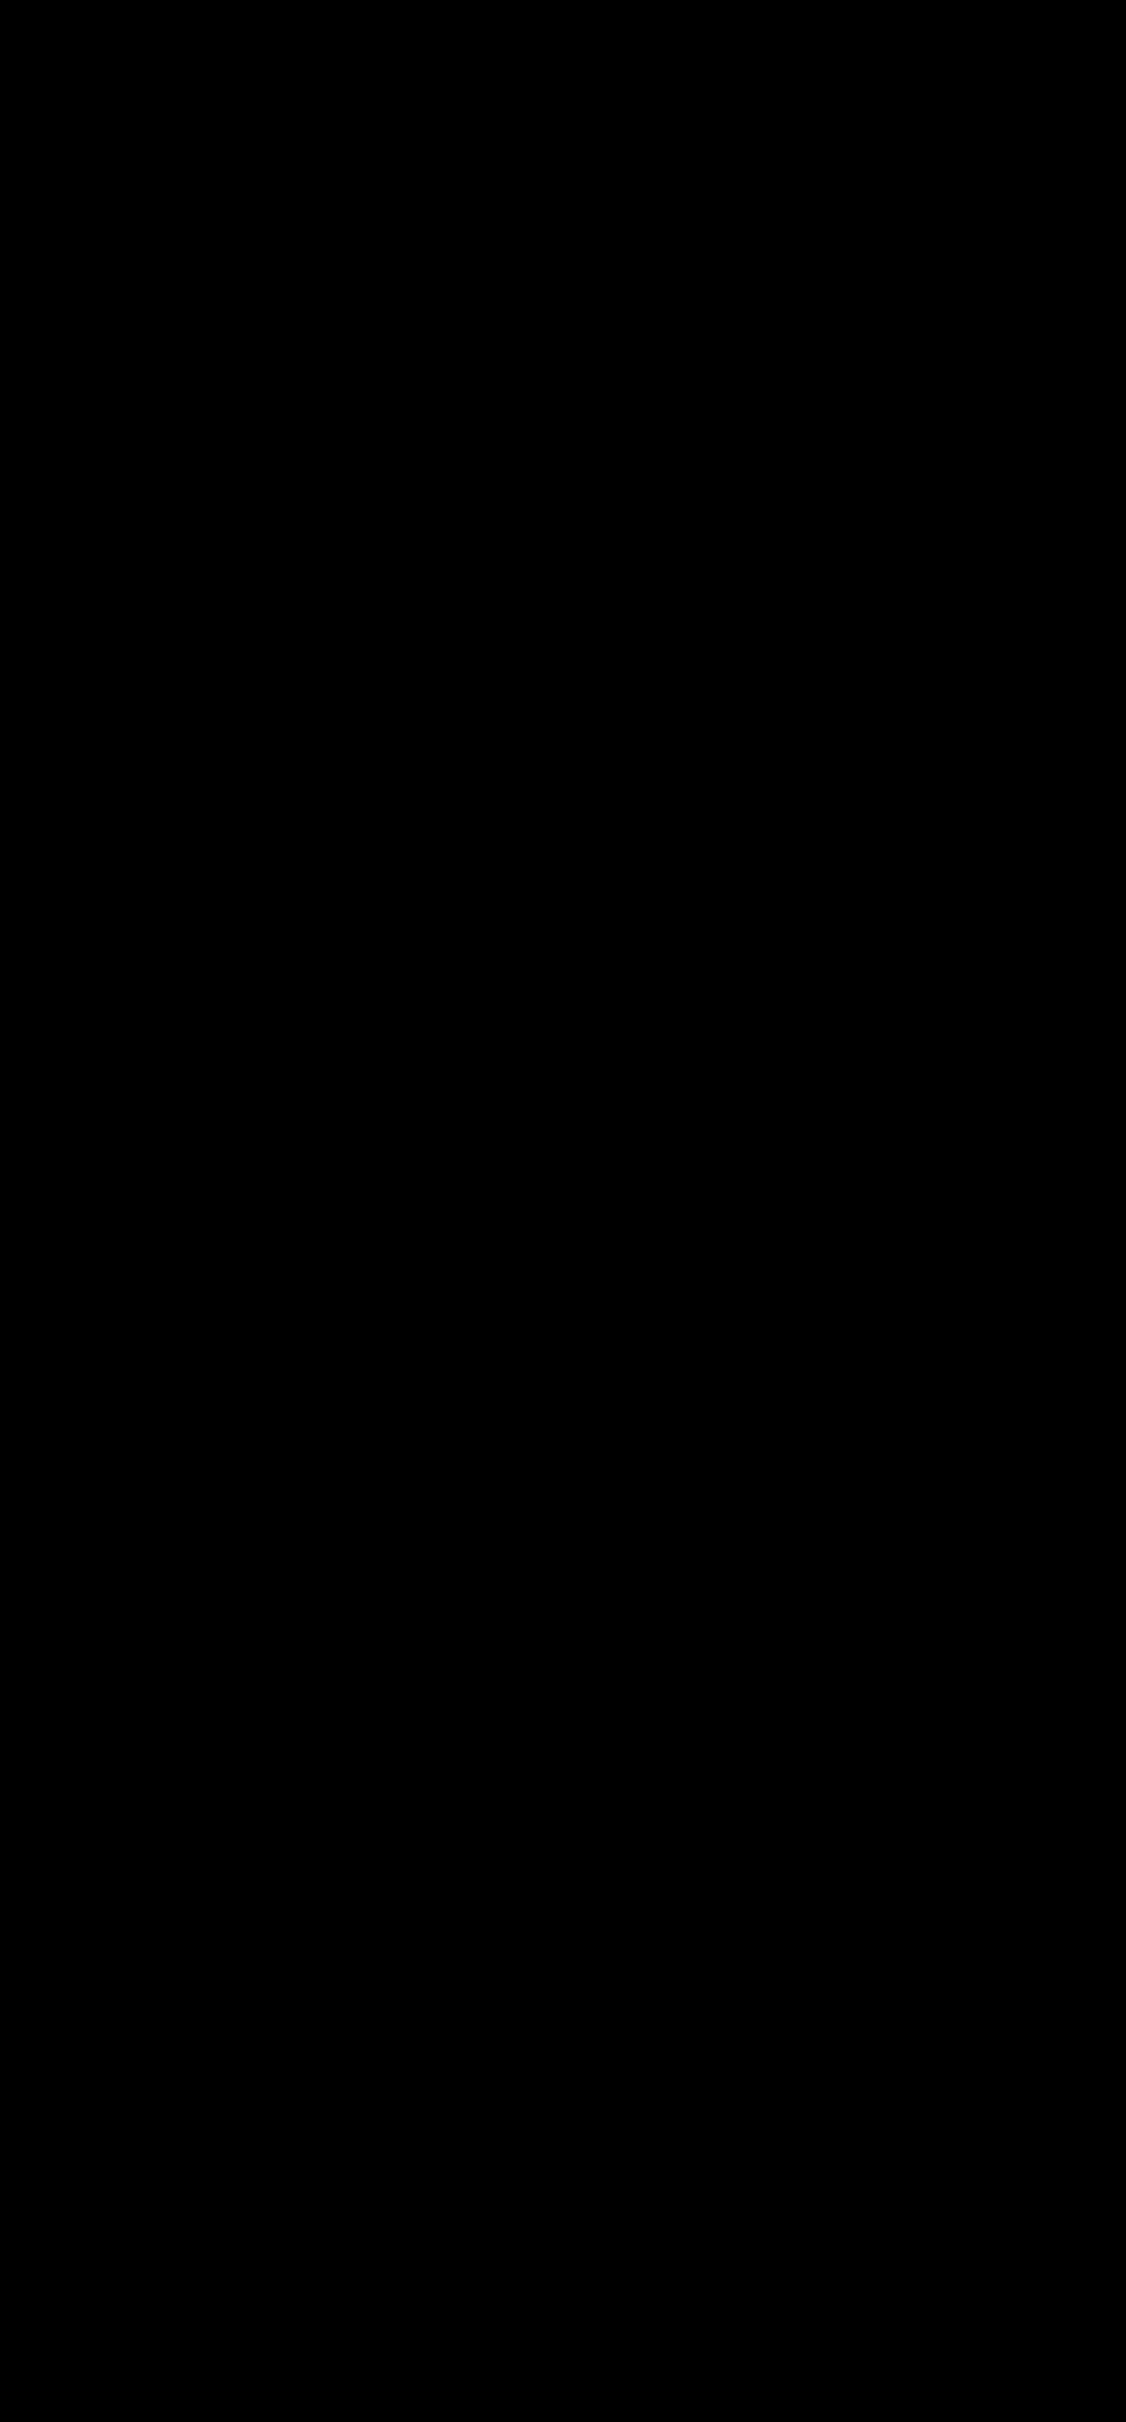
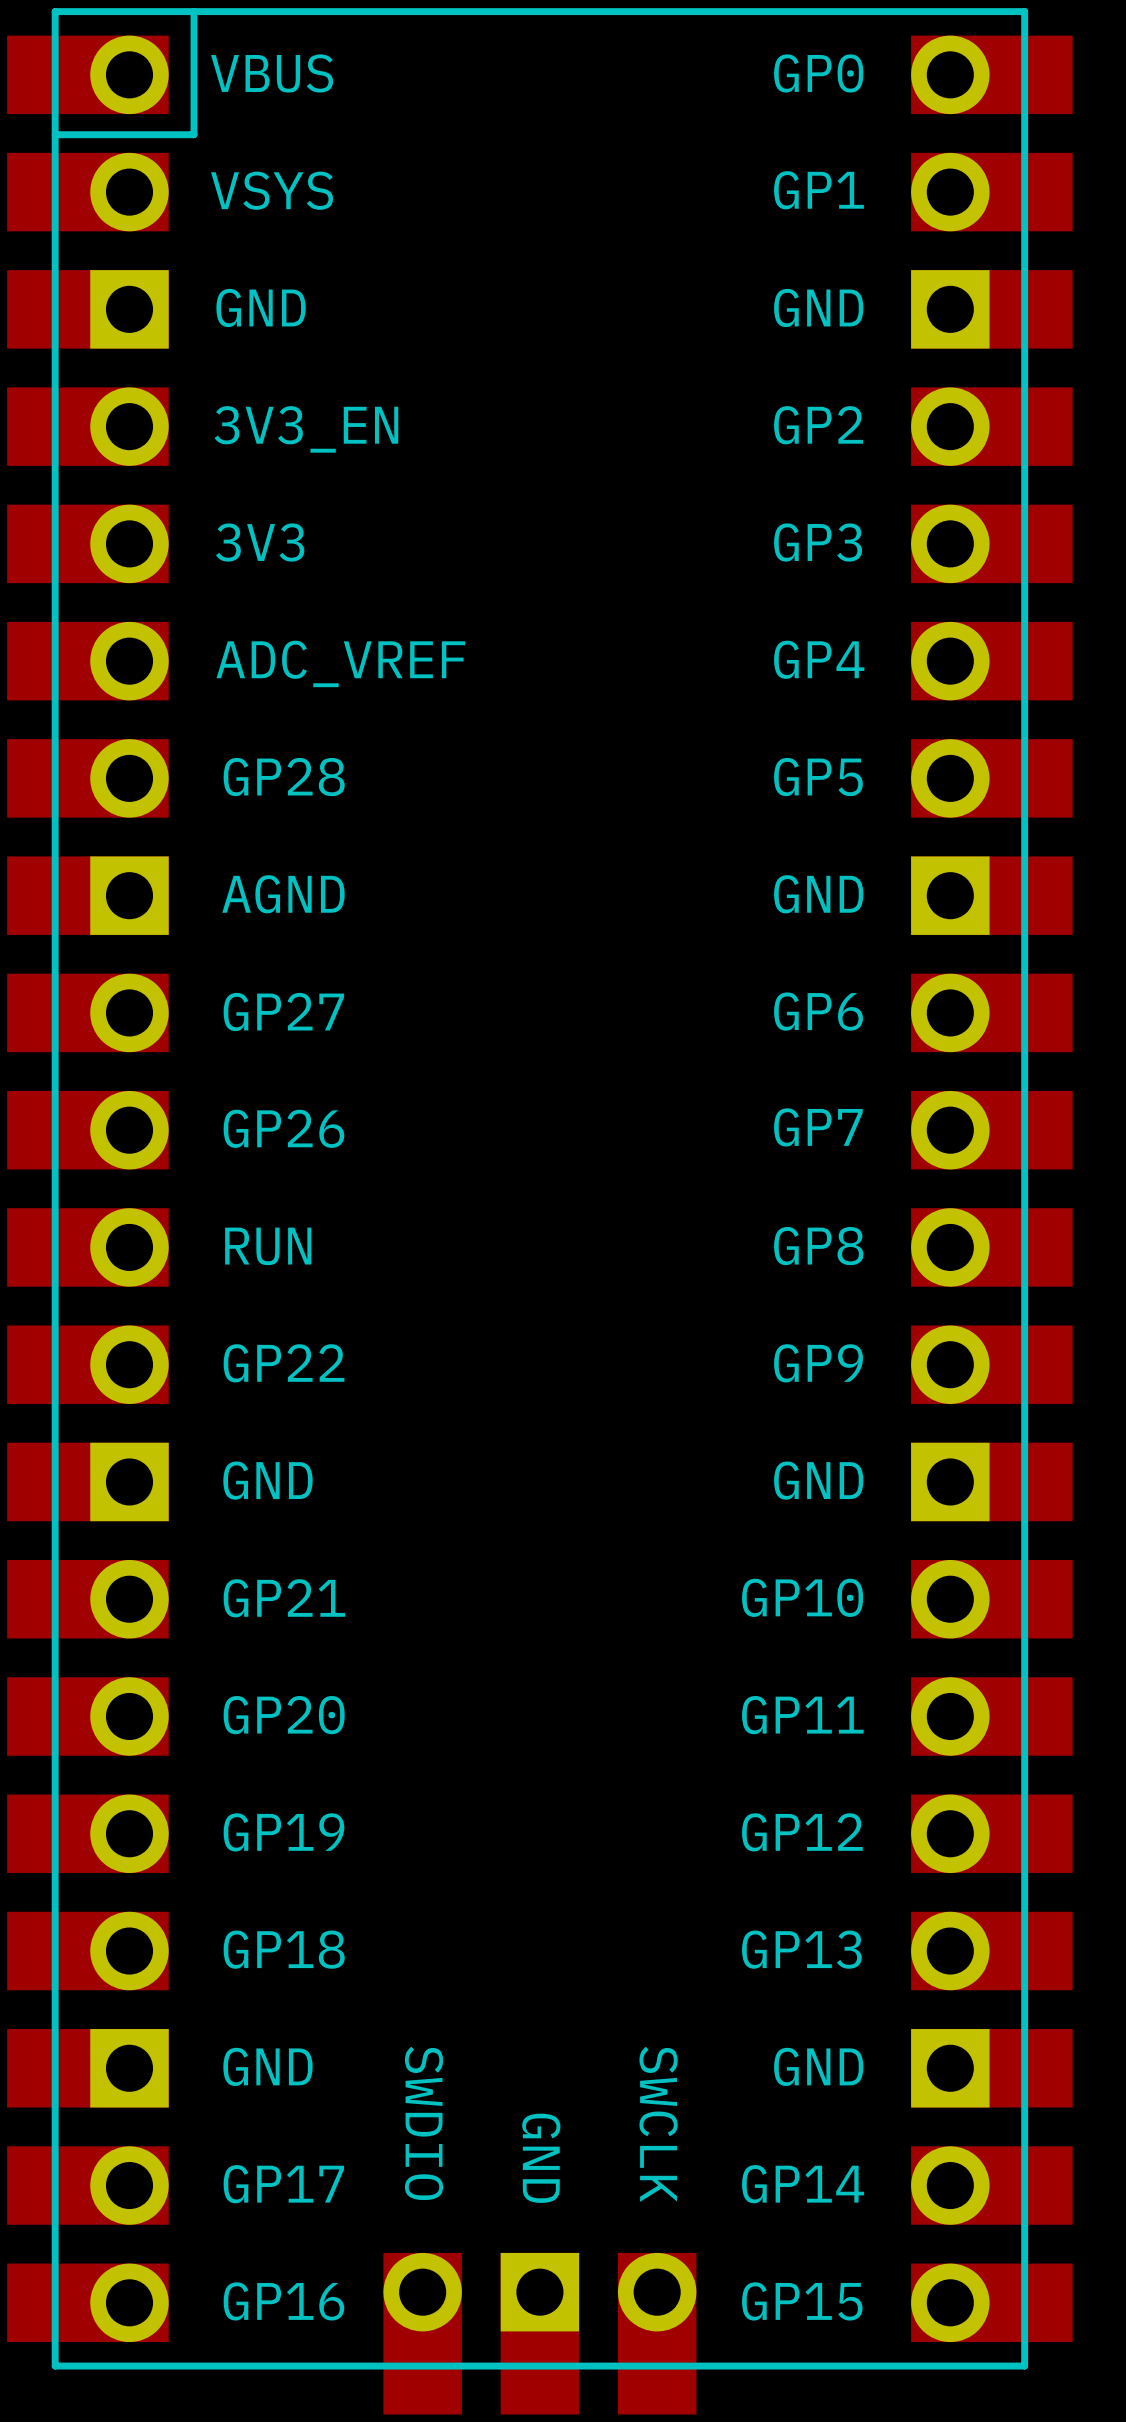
part: none -> (539, 1211)

